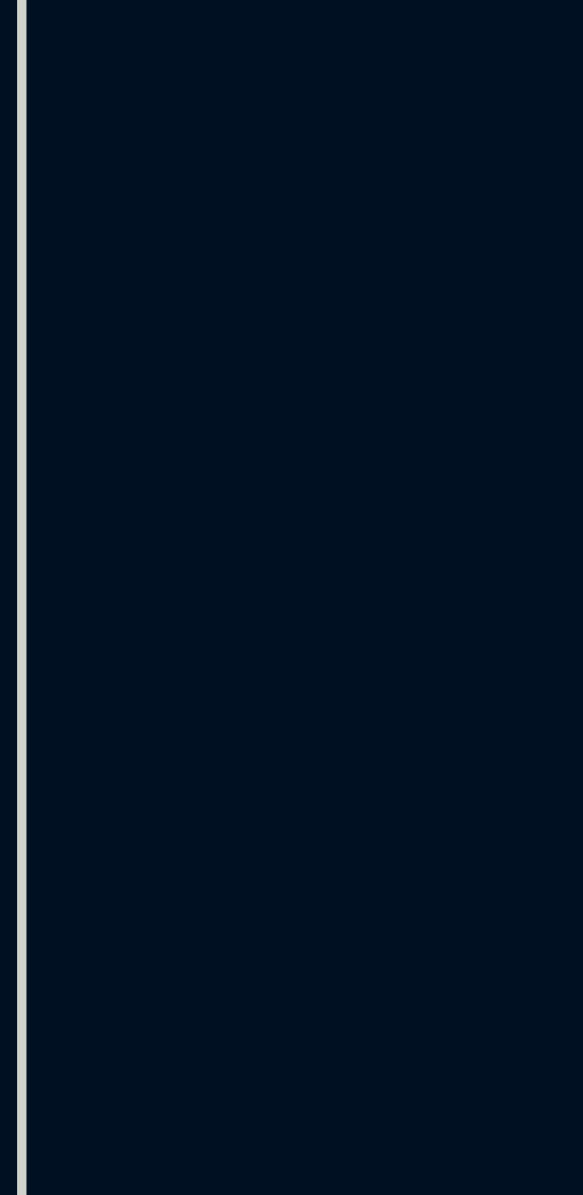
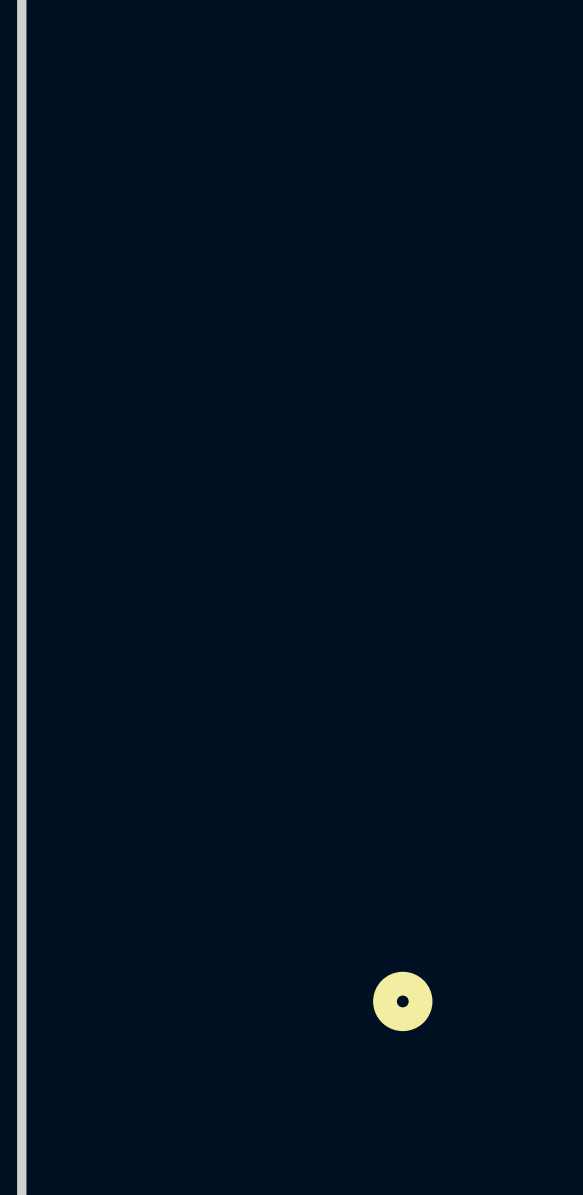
part: none -> (402, 1001)

